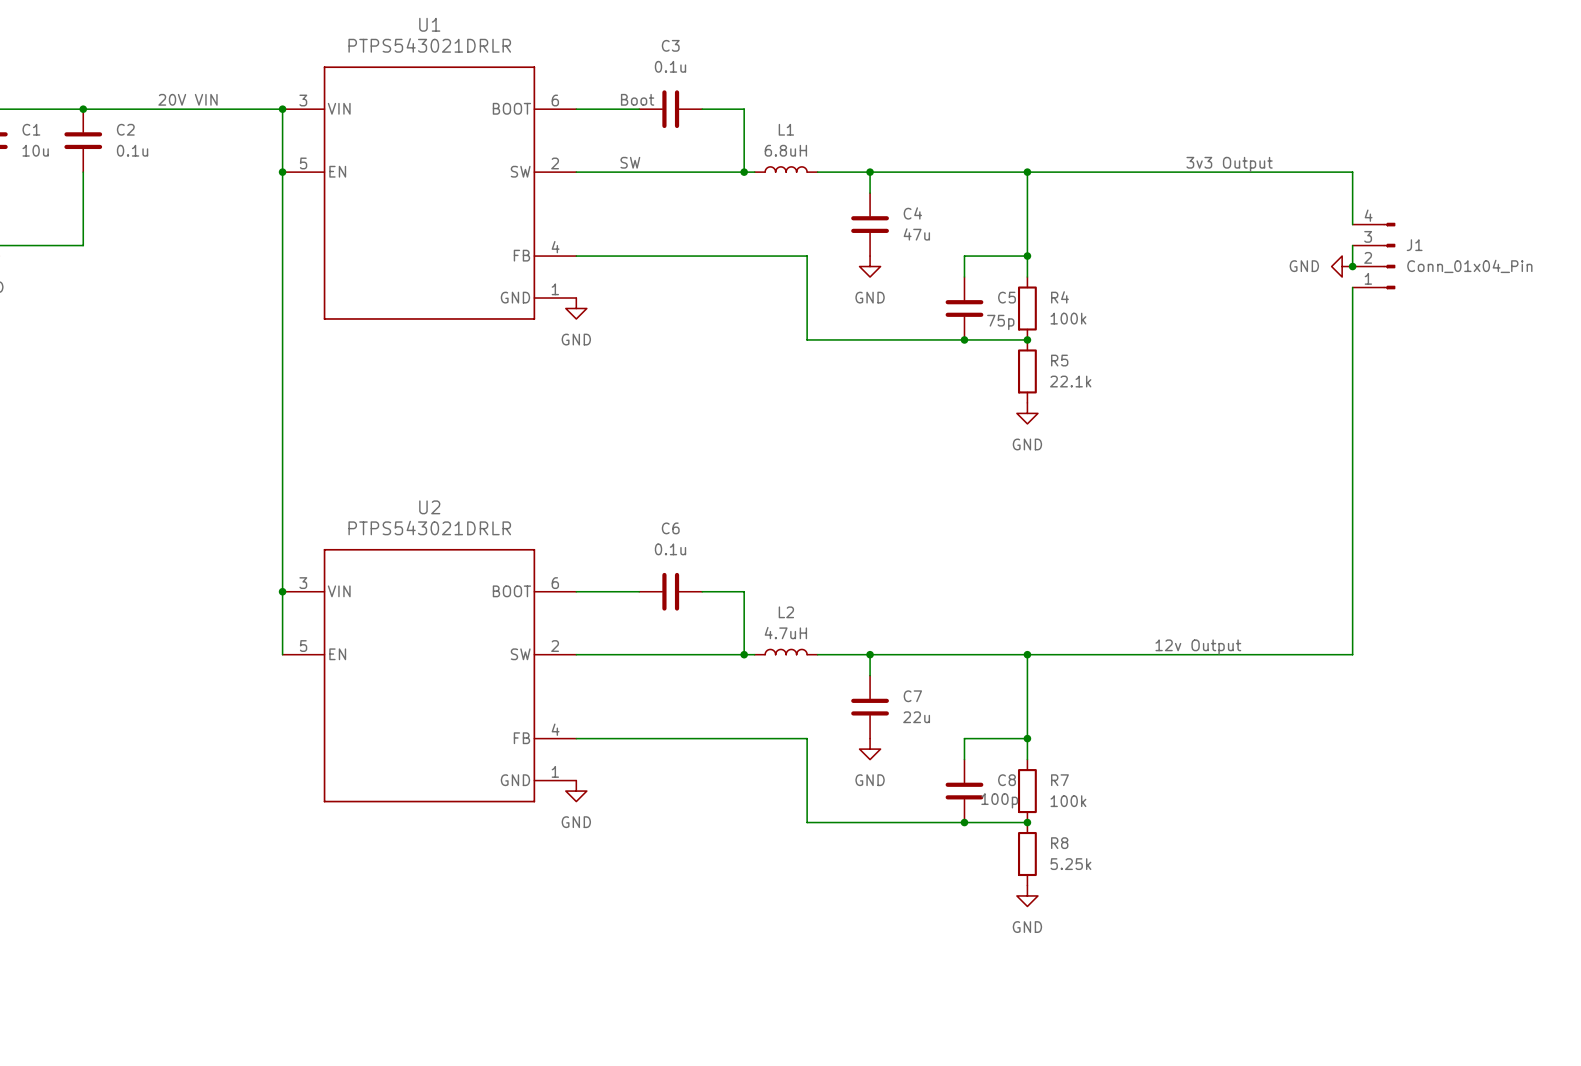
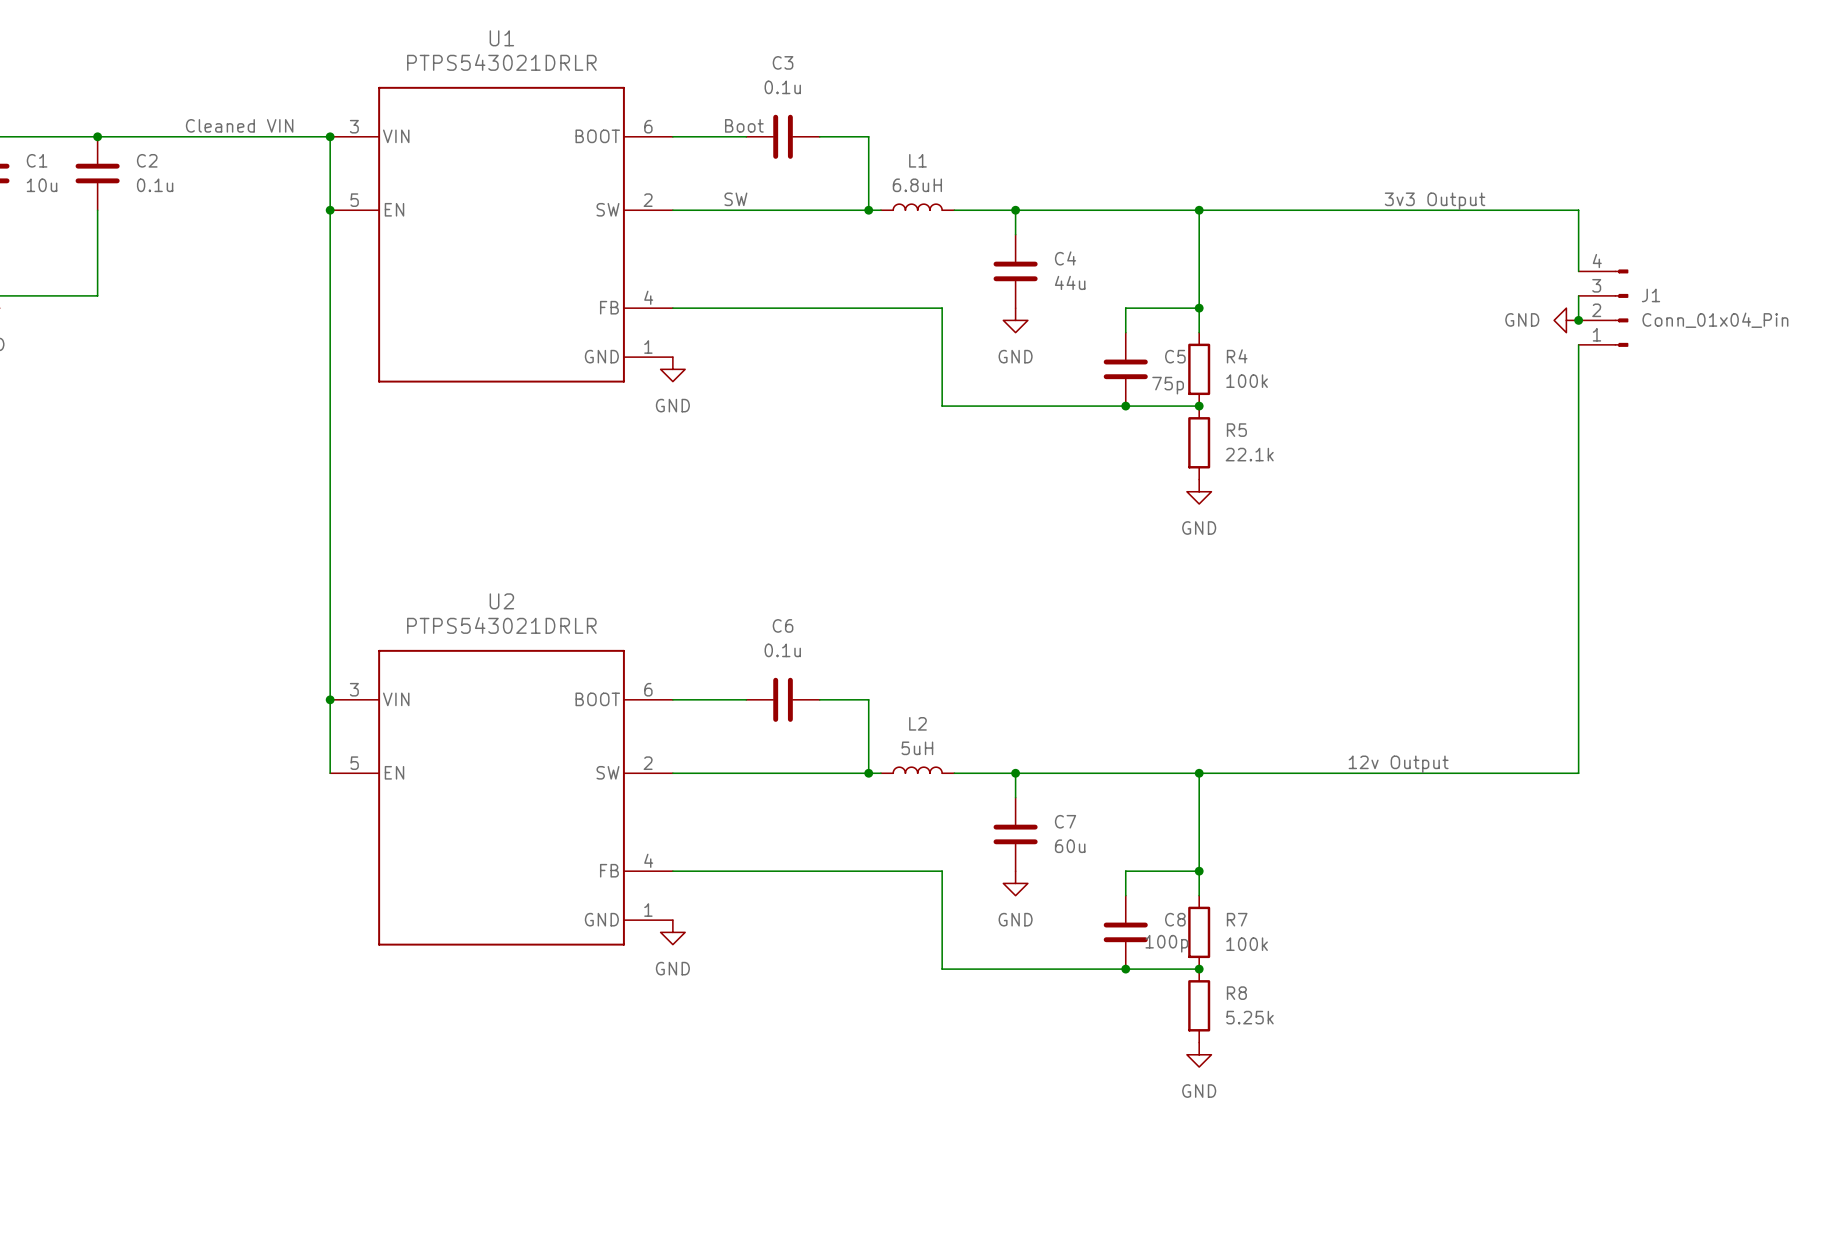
label: 20V VIN (187, 99) -> Cleaned VIN (239, 125)
C4 value: 47u (916, 234) -> 44u (1070, 282)
L2 value: 4.7uH (785, 633) -> 5uH (917, 748)
C7 value: 22u (916, 717) -> 60u (1070, 846)

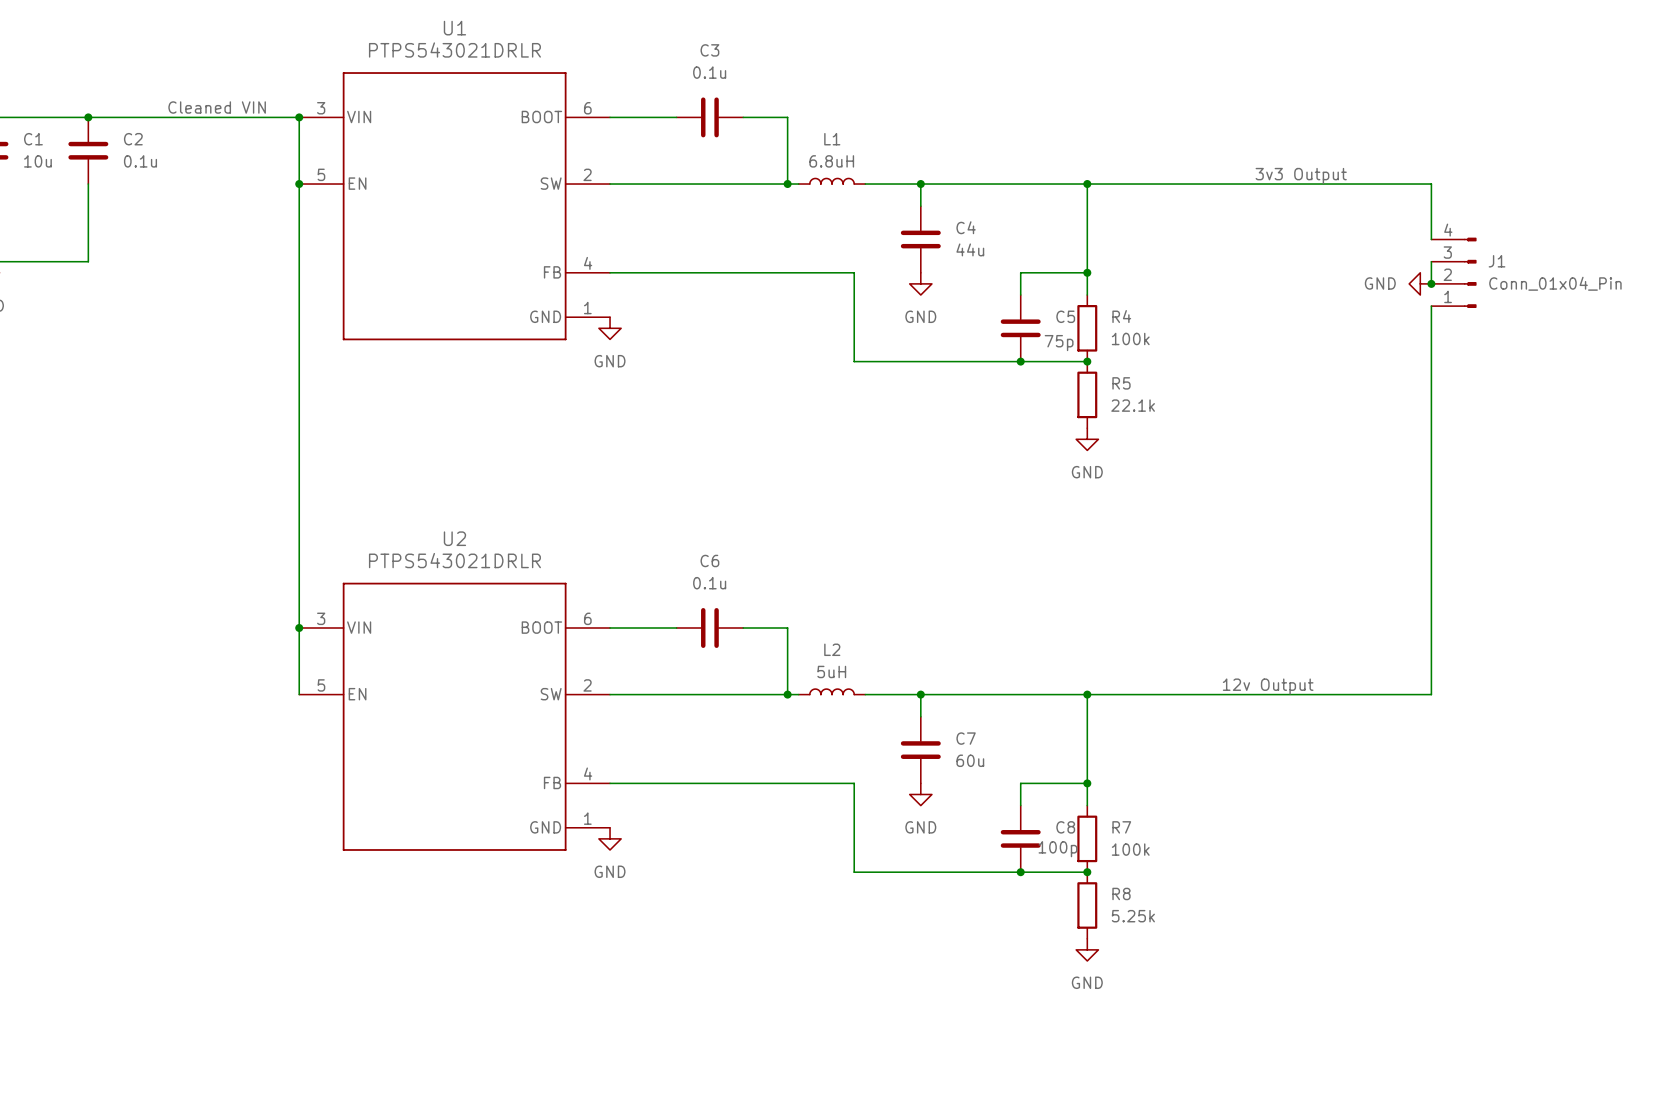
label: Boot (744, 125) -> none
label: SW (735, 199) -> none

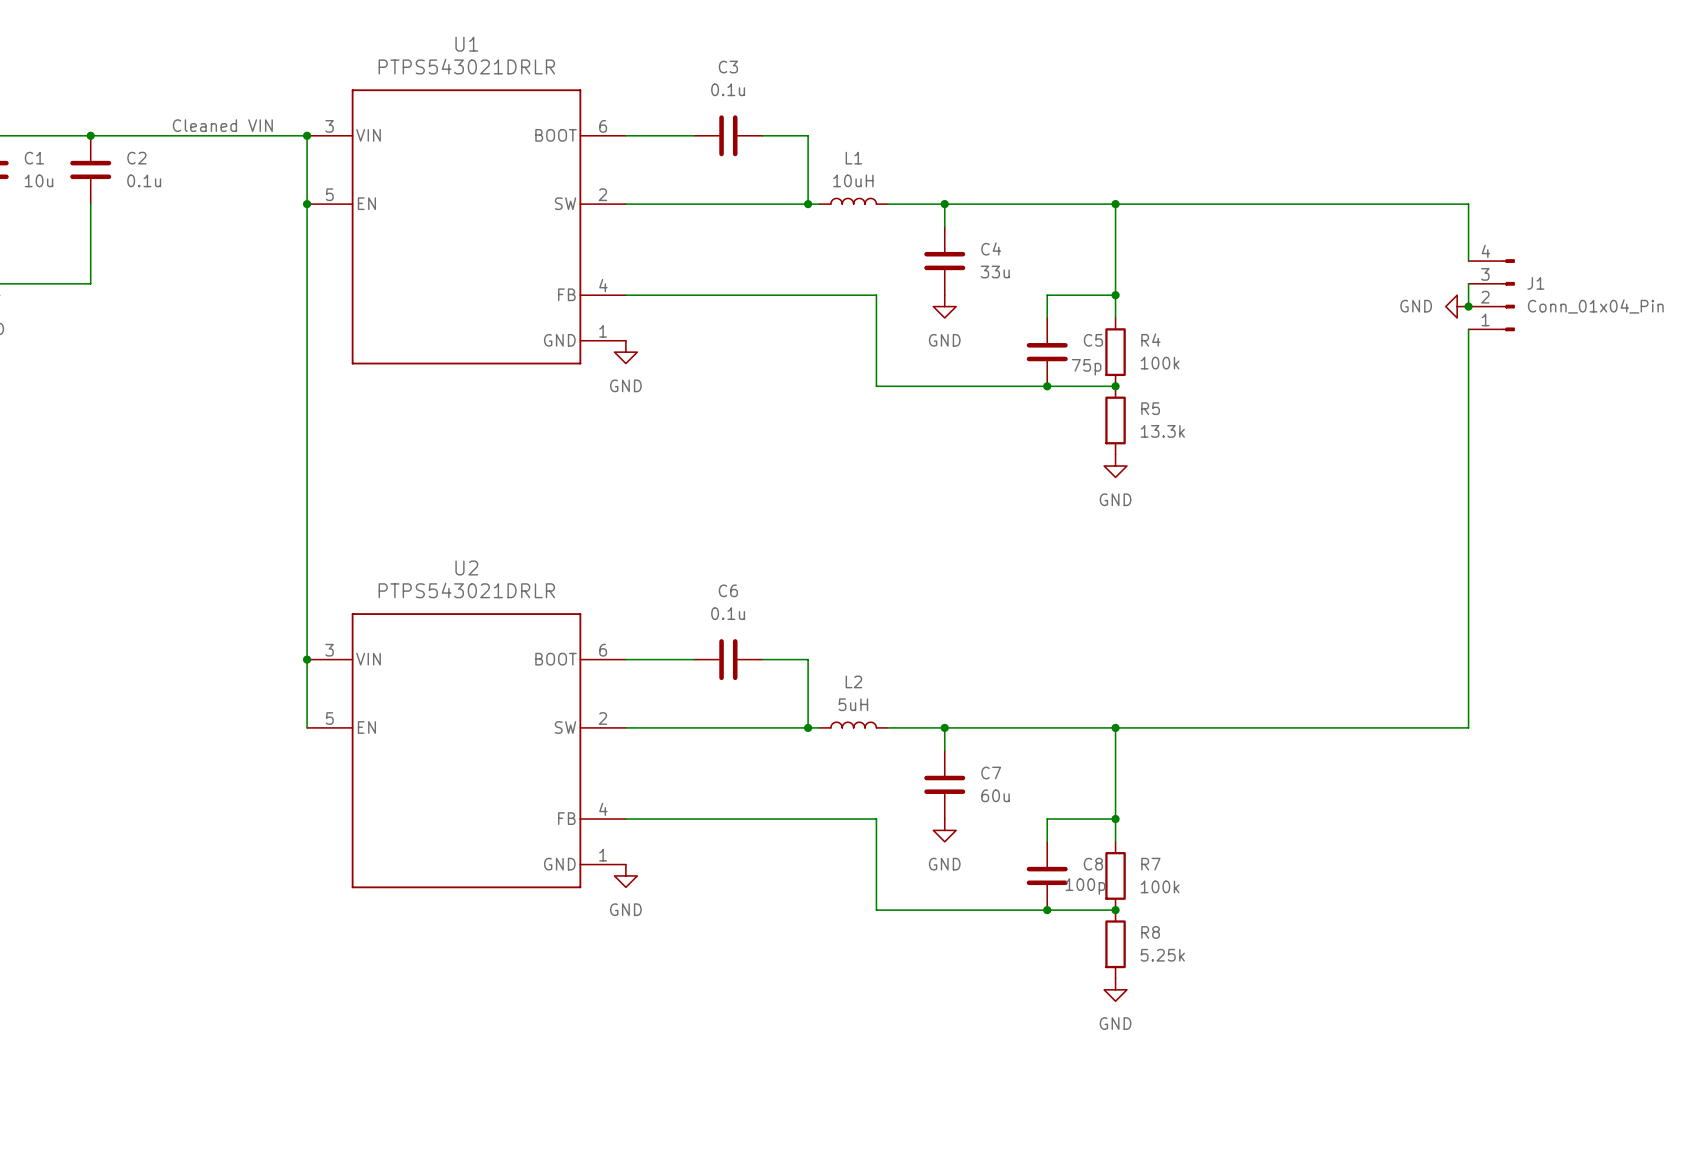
L1 value: 6.8uH (831, 161) -> 10uH (853, 180)
label: 3v3 Output (1301, 175) -> none
C4 value: 44u (970, 249) -> 33u (995, 272)
R5 value: 22.1k (1133, 405) -> 13.3k (1162, 431)
label: 12v Output (1268, 686) -> none

